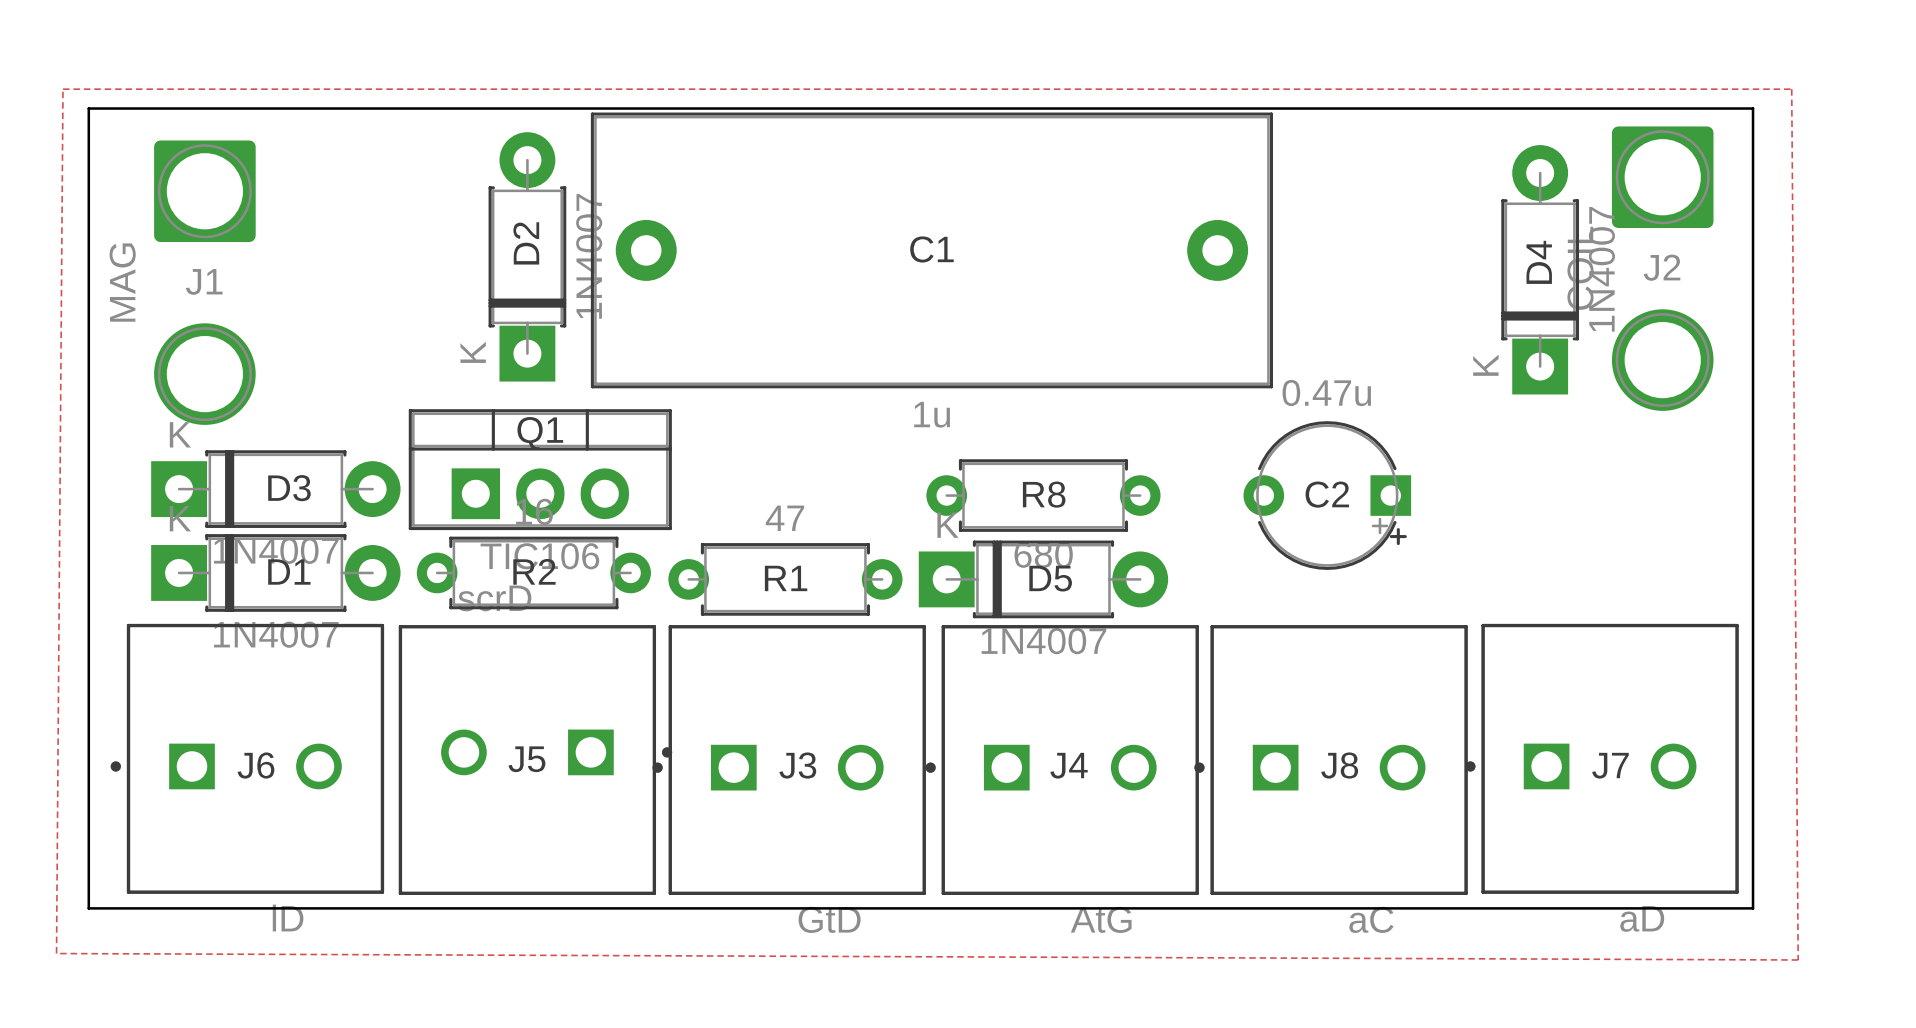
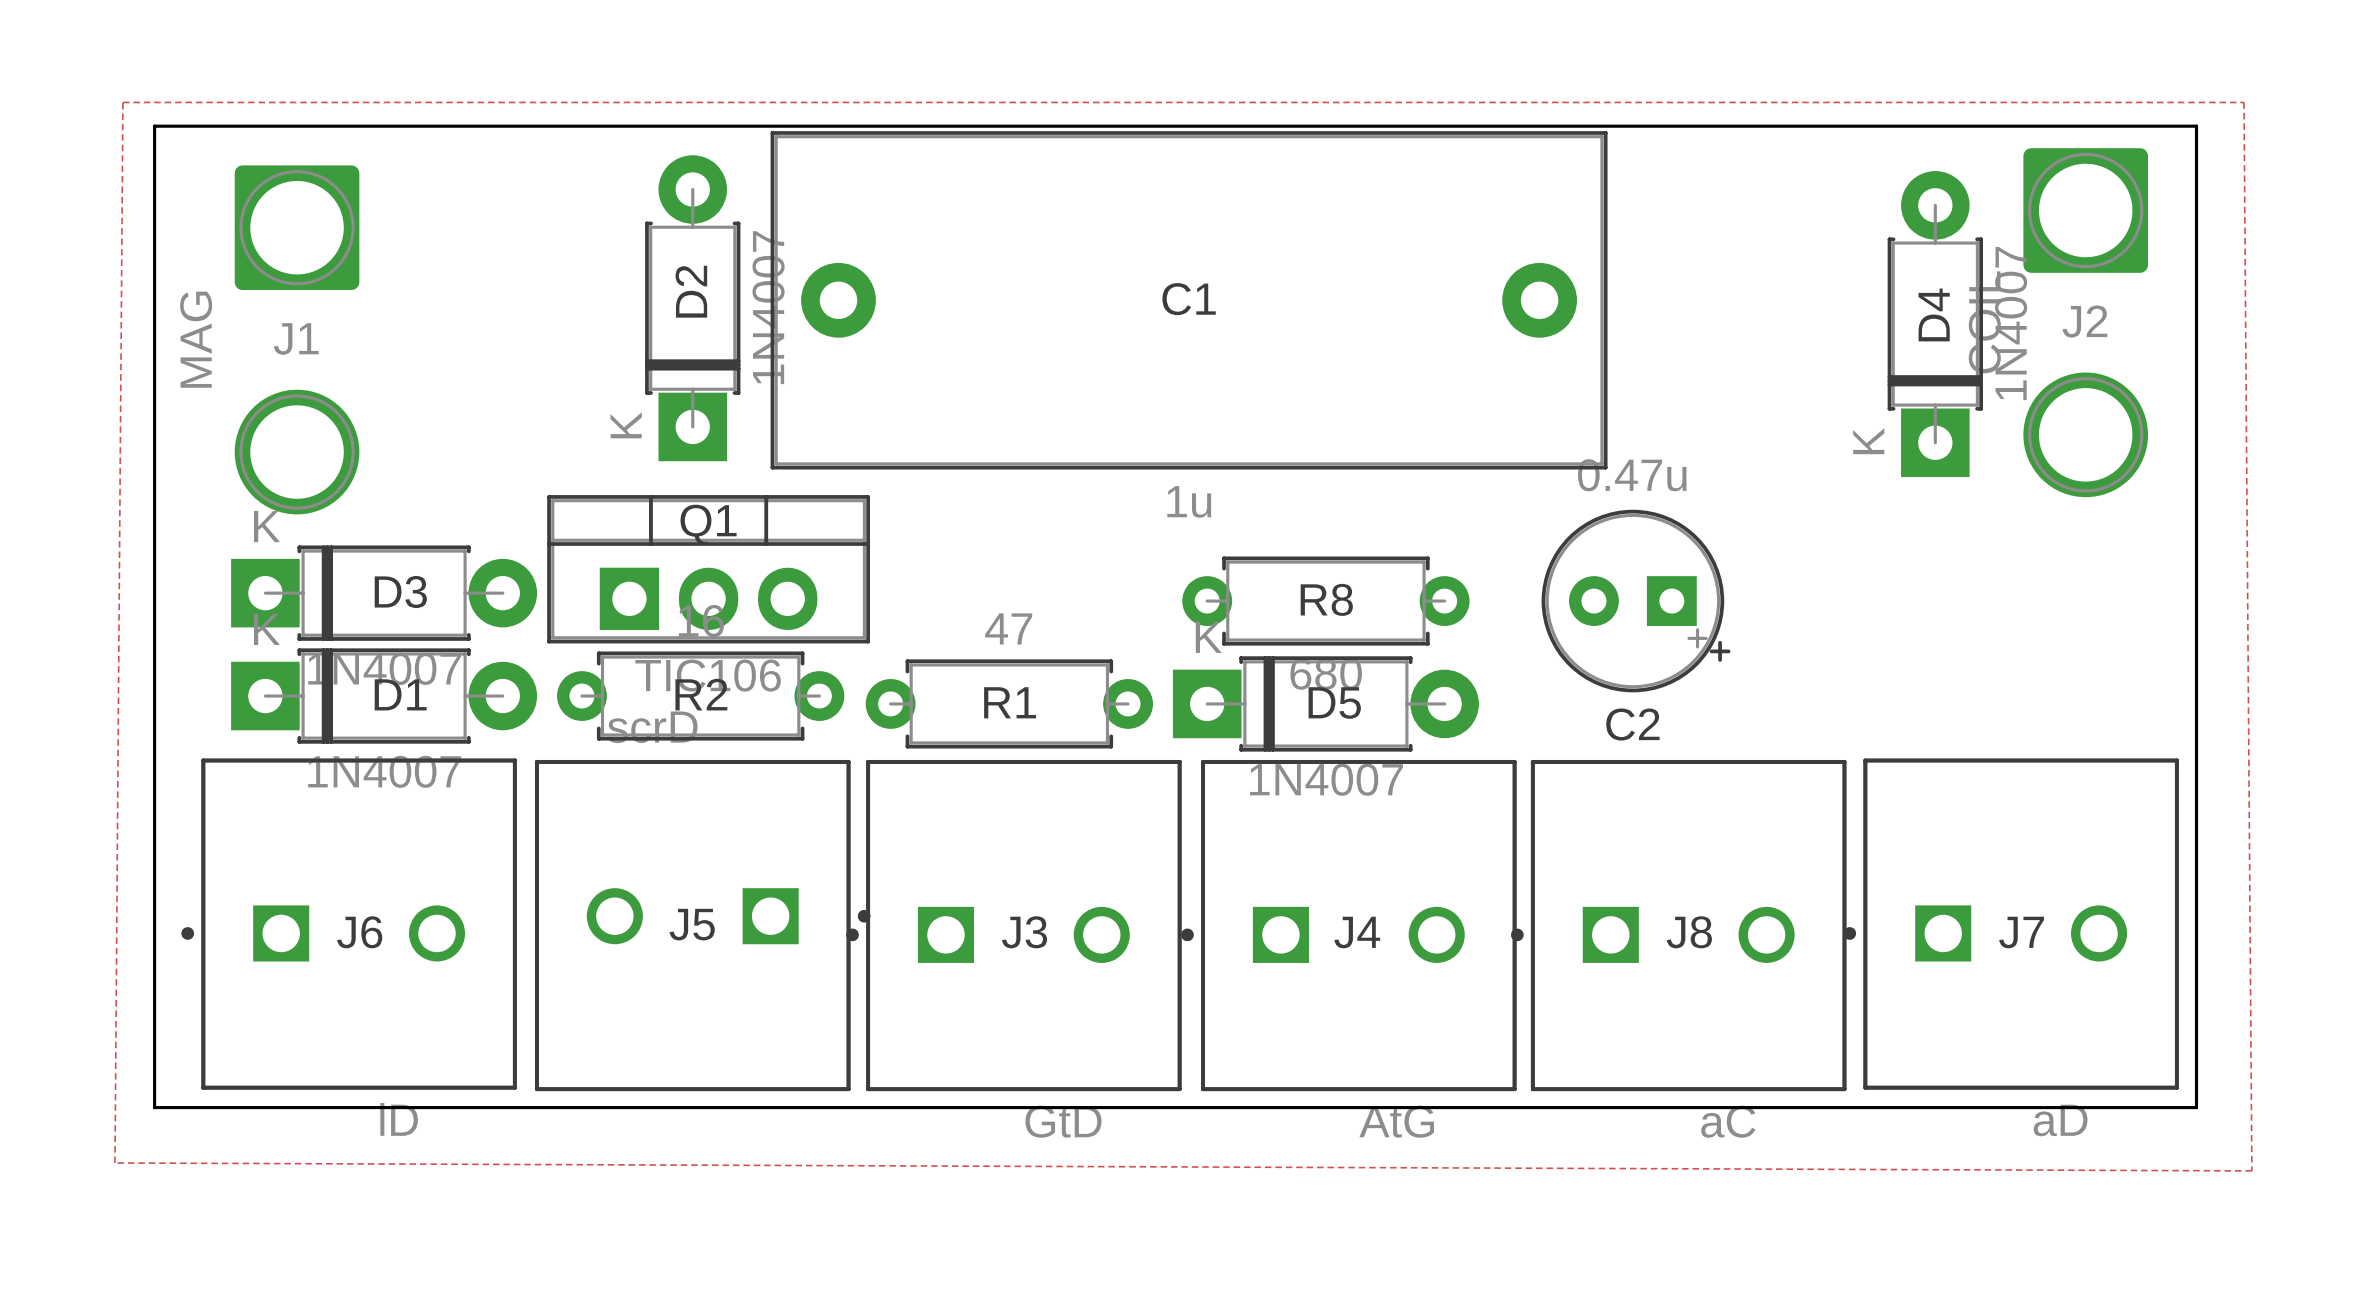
C2 footprint: [1243, 421, 1412, 570] -> [1541, 509, 1731, 693]
C2 name position: C2 (1327, 494) -> C2 (1632, 724)

